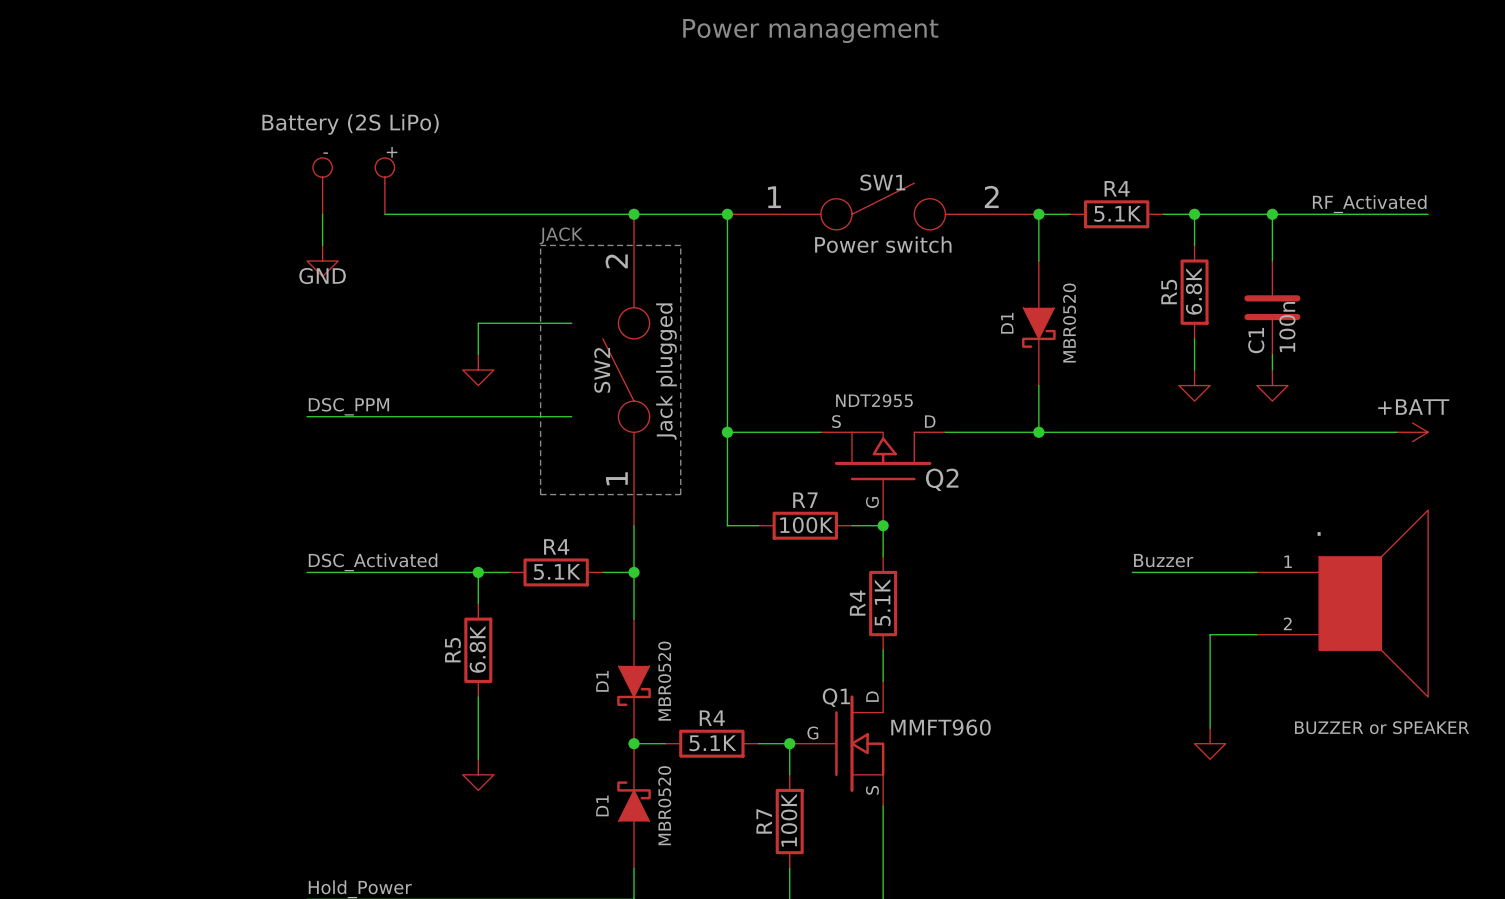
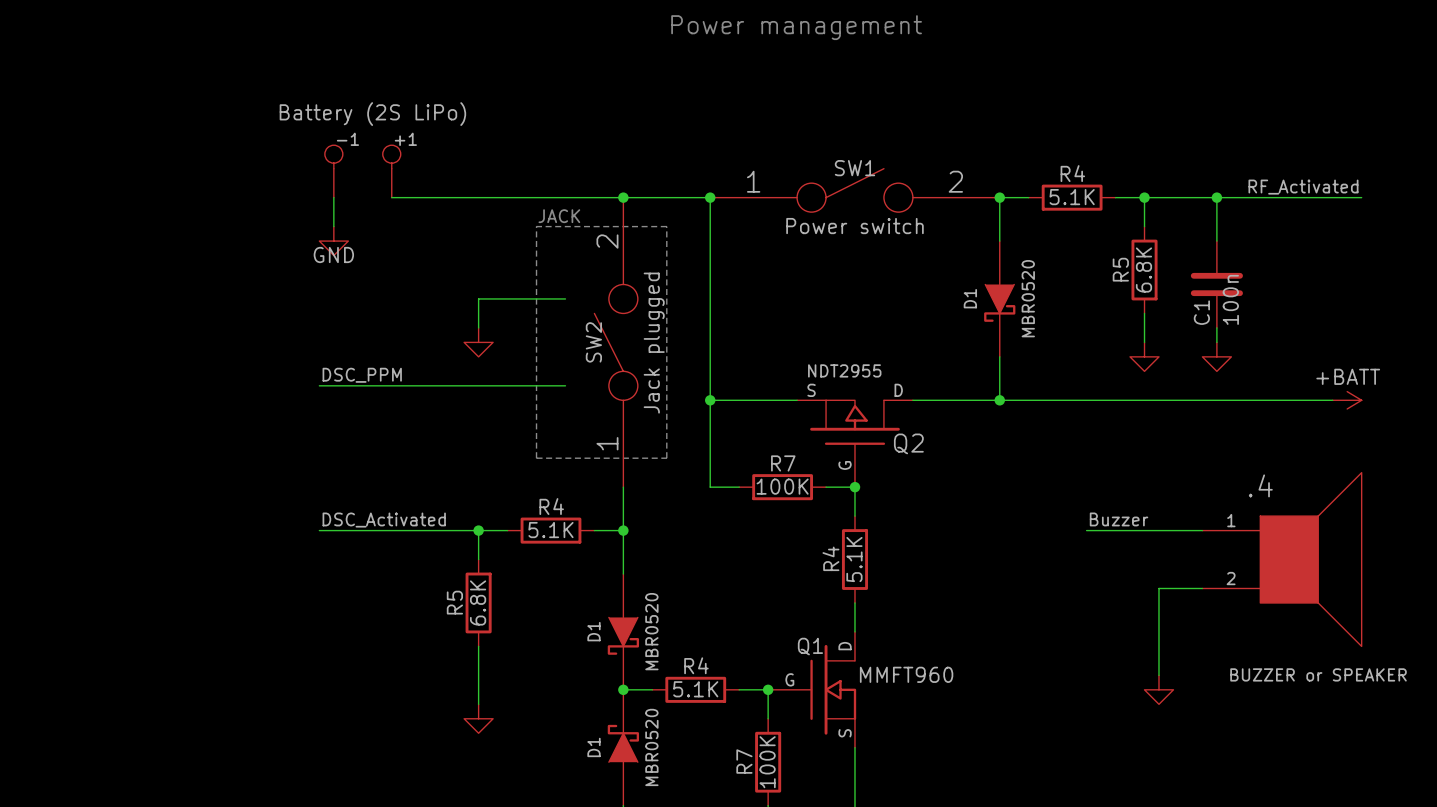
+1 name: + (392, 152) -> +1 (405, 139)
-1 name: - (325, 153) -> -1 (347, 139)
.4 name: . (1319, 533) -> .4 (1260, 485)

